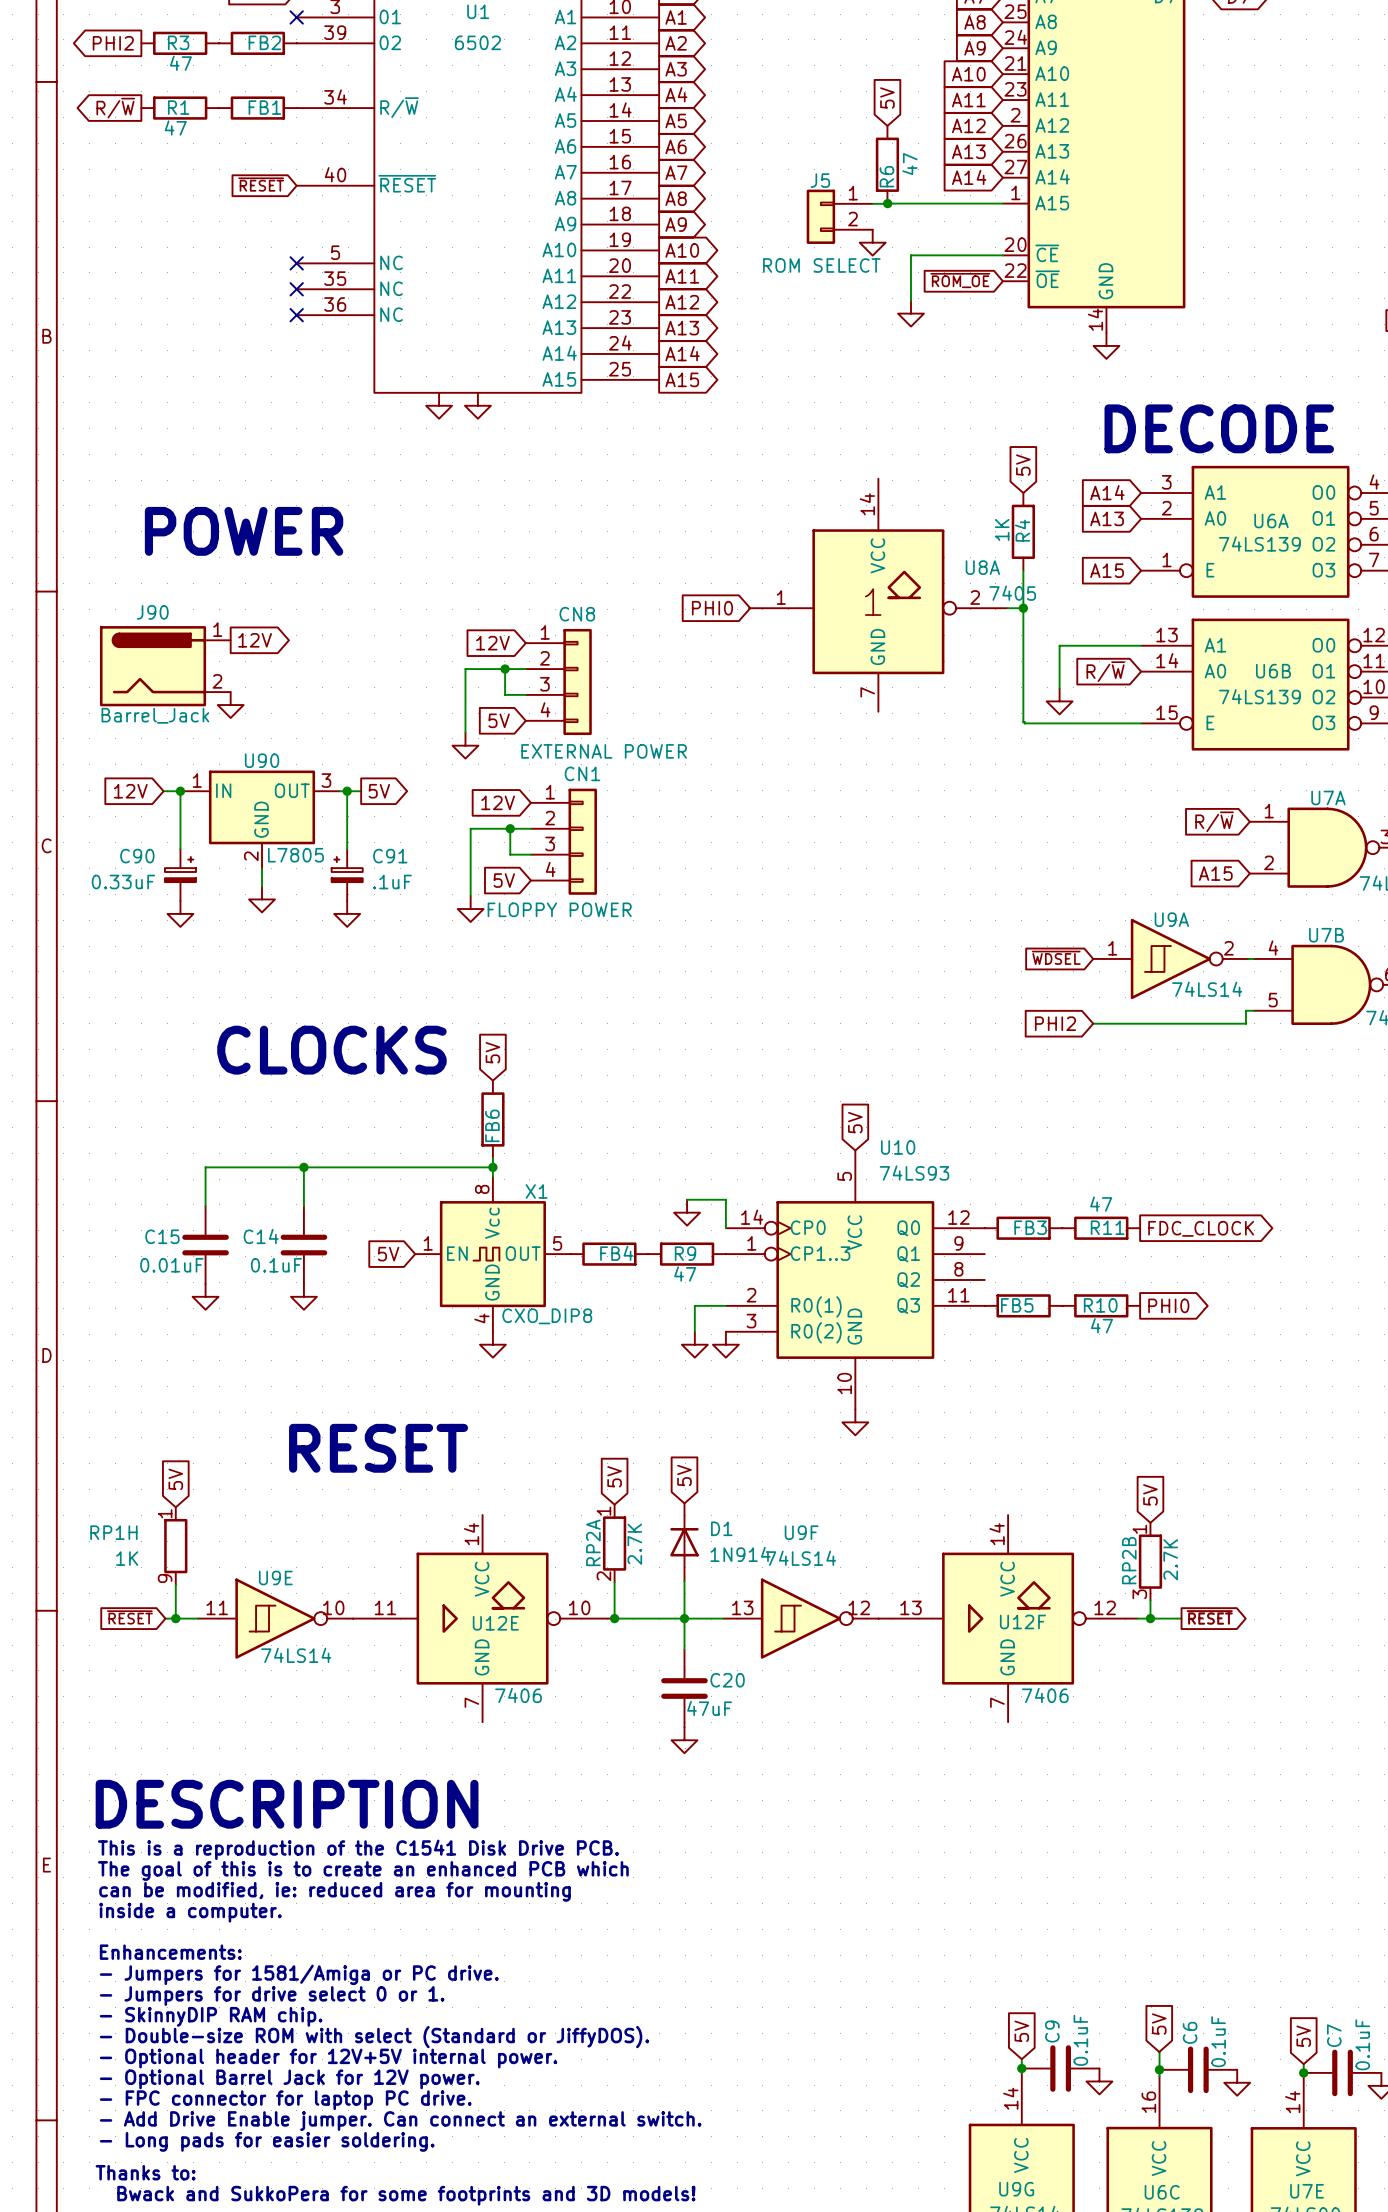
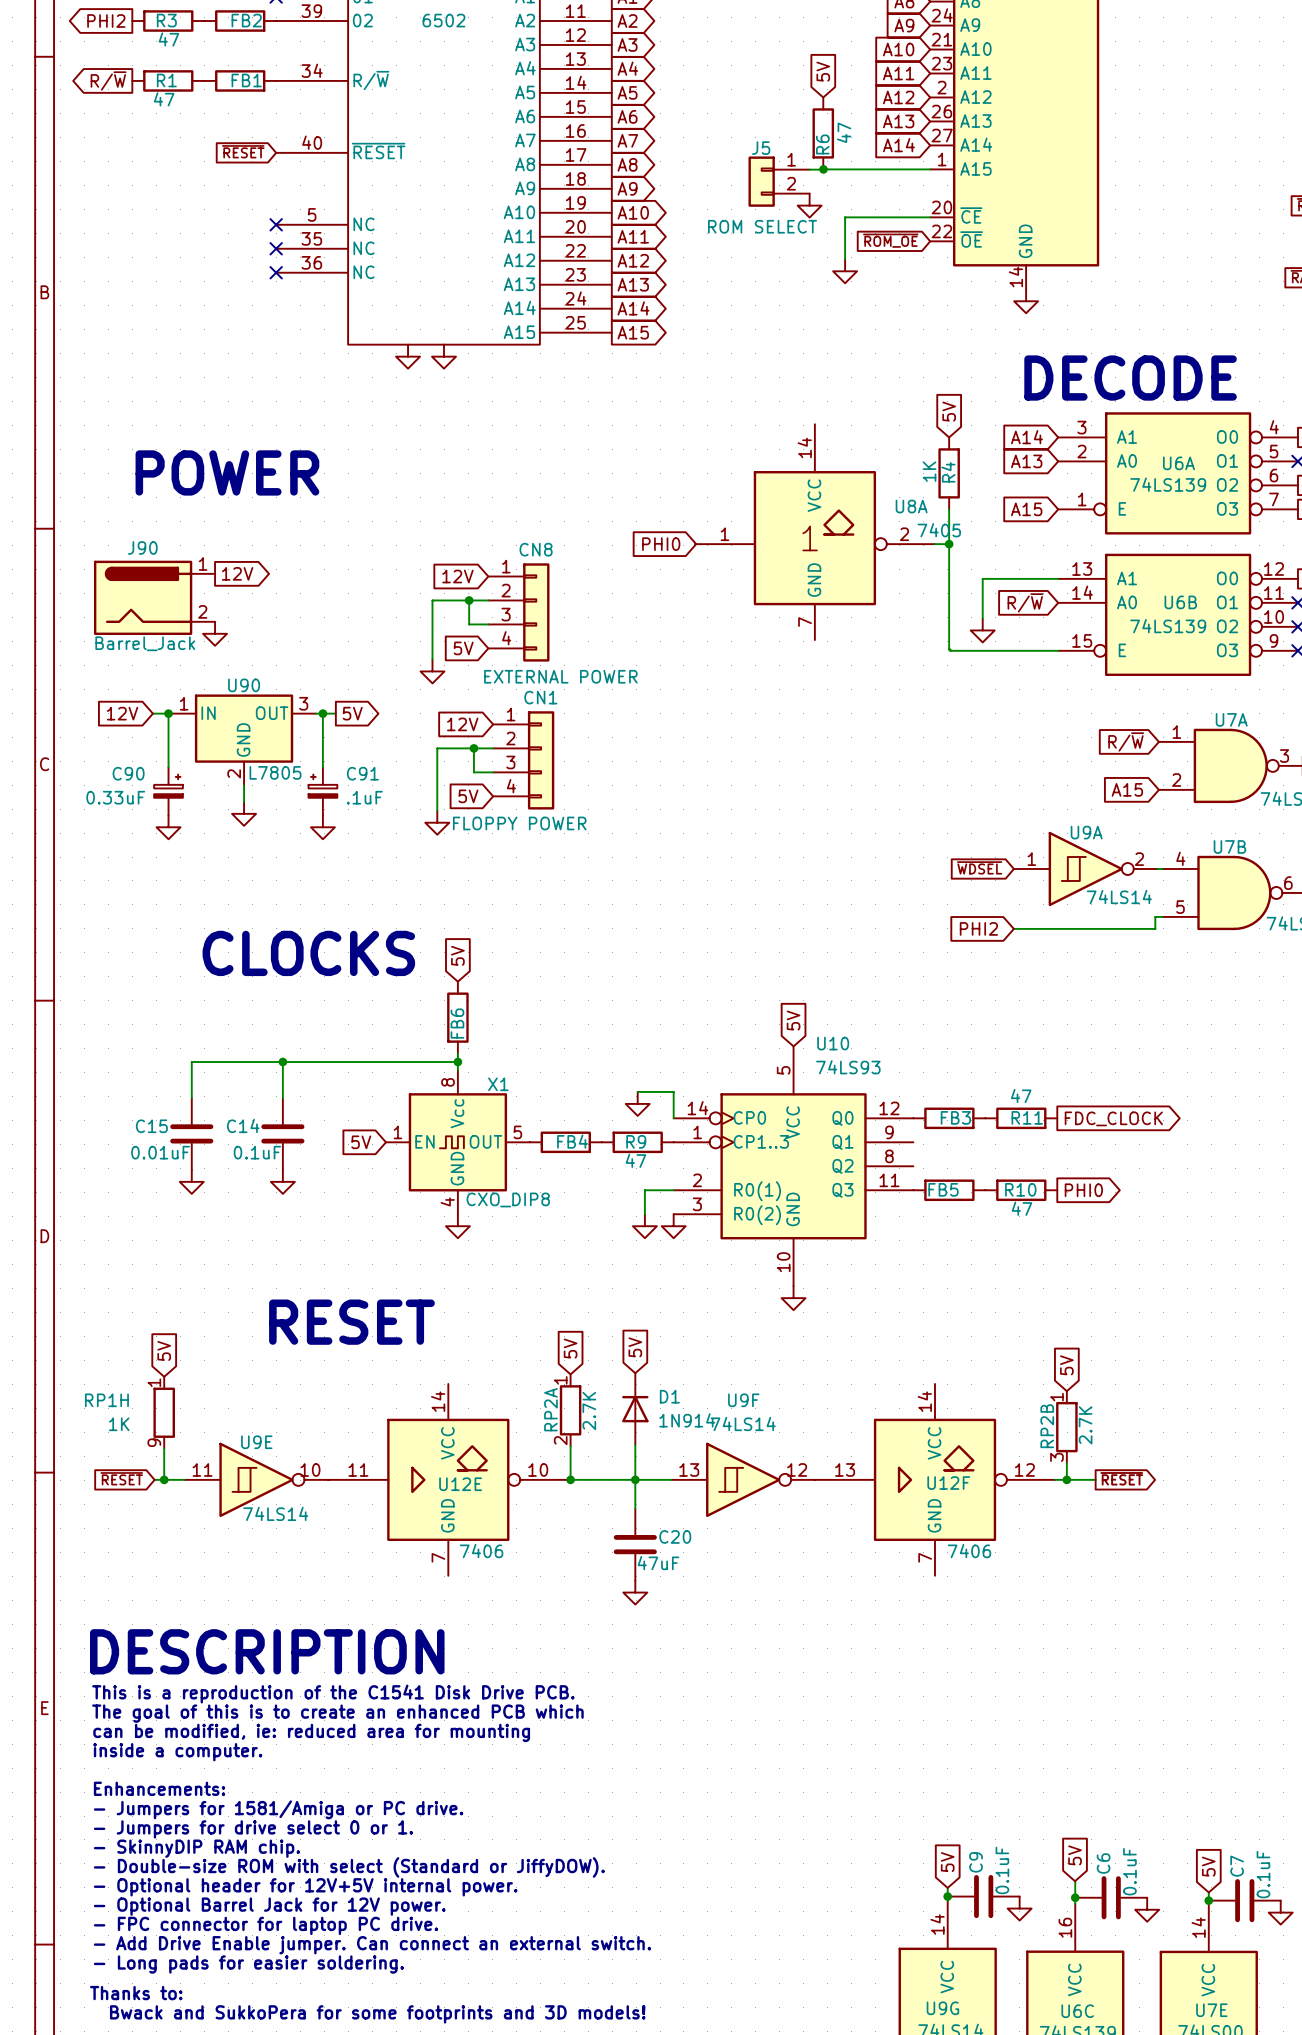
text: - Double-size ROM with select (Standard or JiffyDOS). (374, 2037) -> - Double-size ROM with select (Standard or JiffyDOW). (349, 1867)

